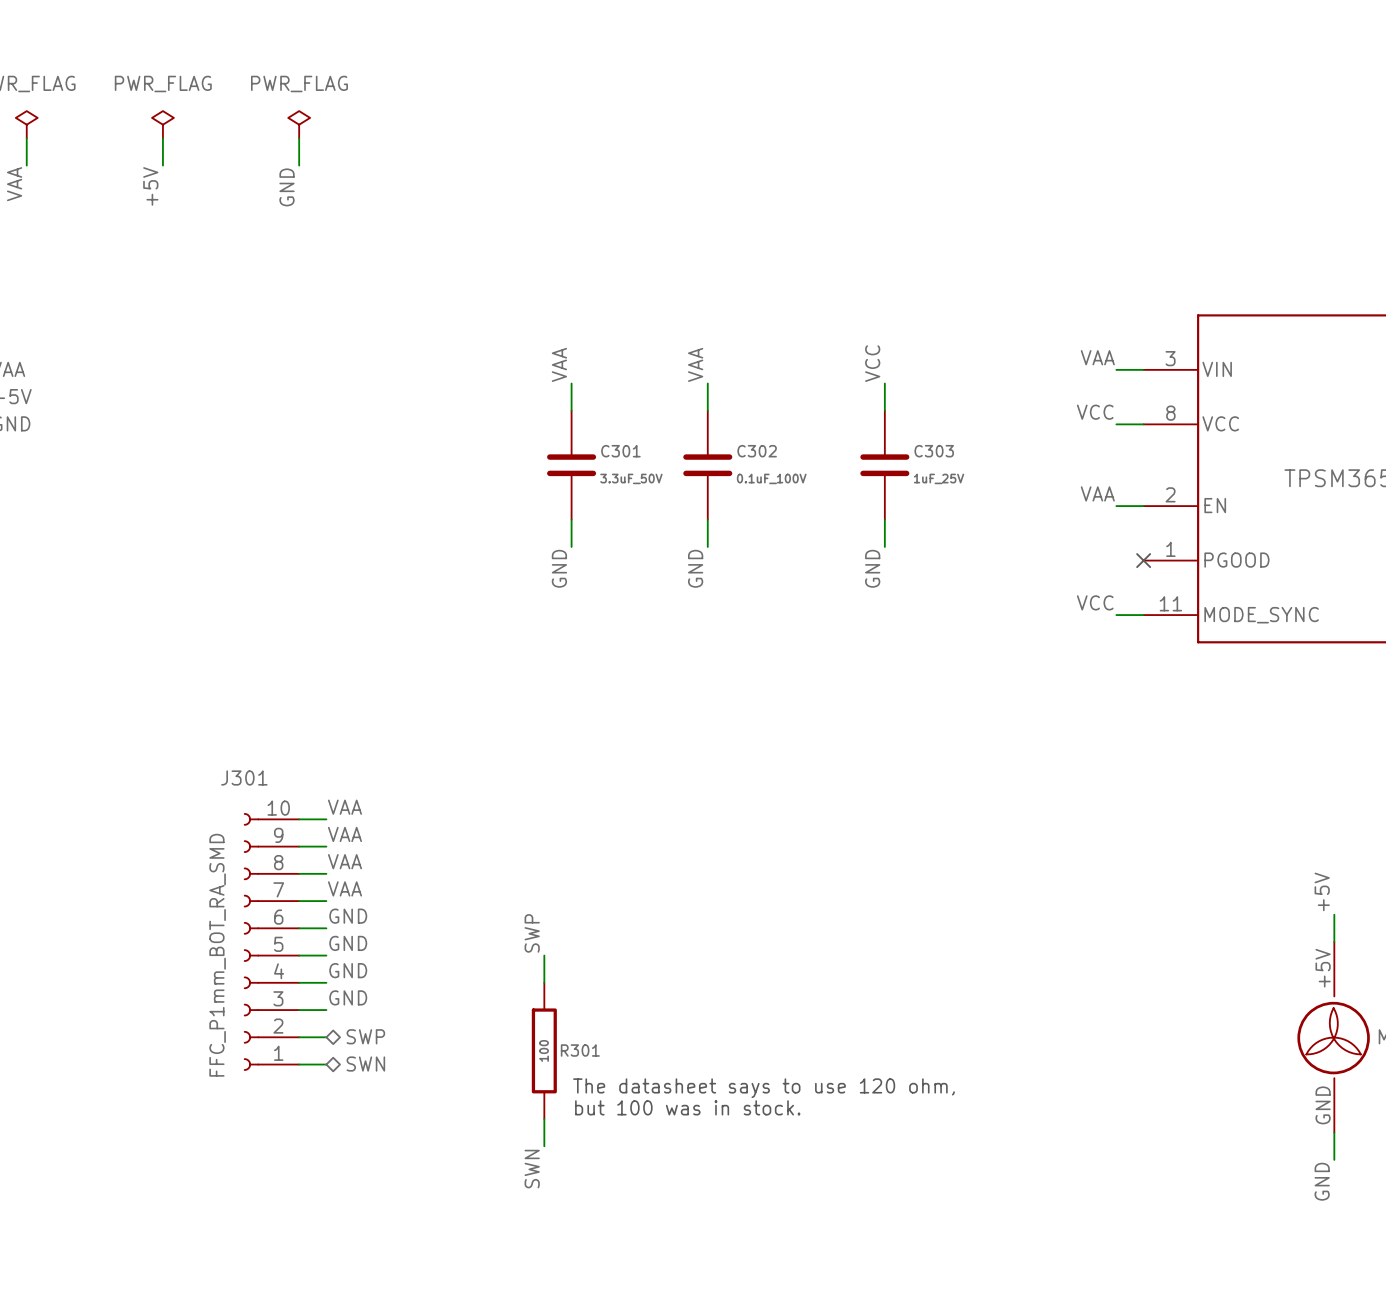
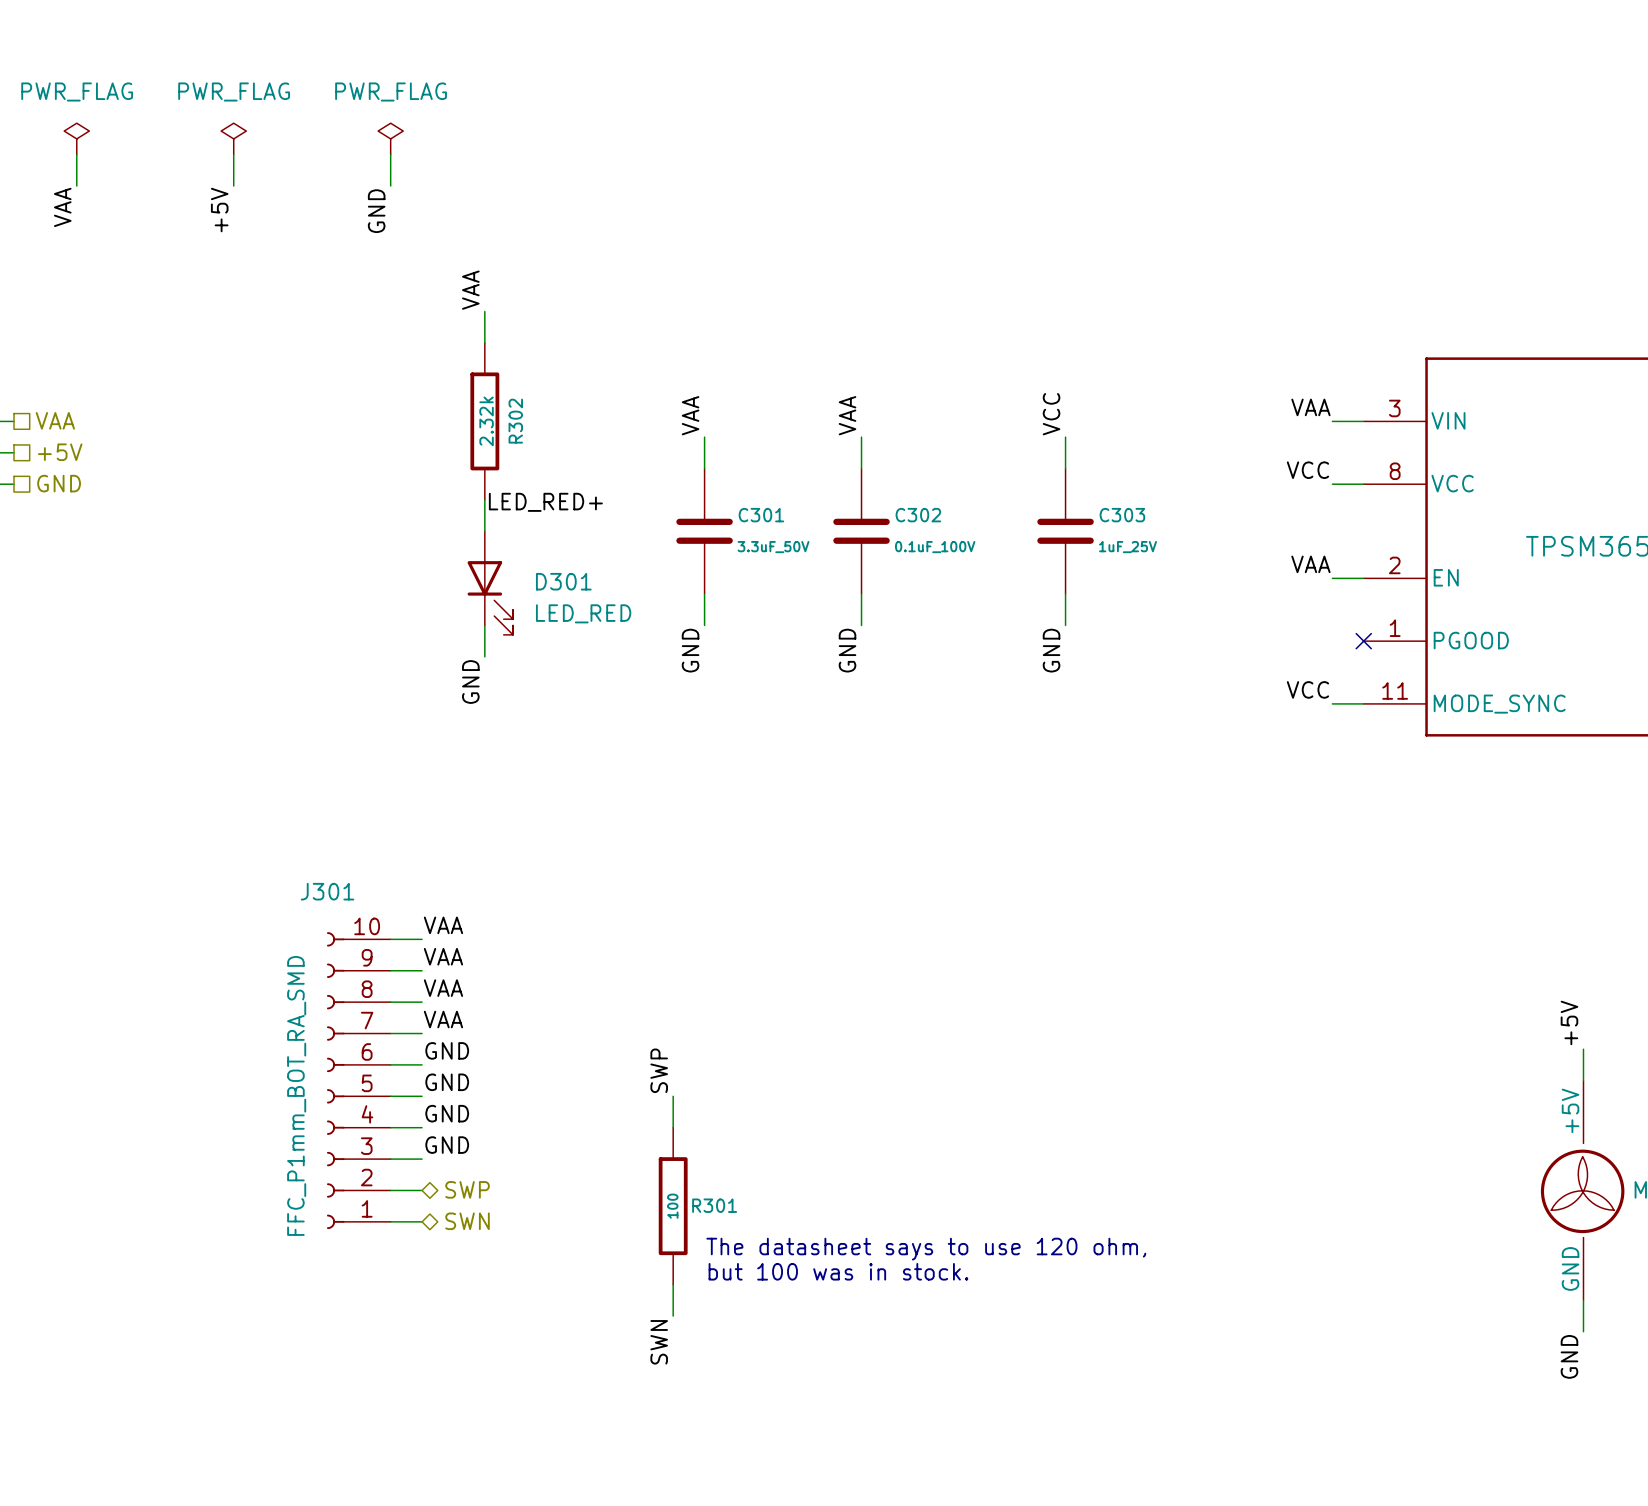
label: none -> VAA (470, 290)
wire: none -> (484, 311) (484, 342)
R302: none -> 2.32k (484, 421)
wire: none -> (484, 499) (484, 531)
label: none -> LED_RED+ (545, 502)
D301: none -> LED_RED (490, 583)
wire: none -> (484, 625) (484, 656)
label: none -> GND (470, 682)

